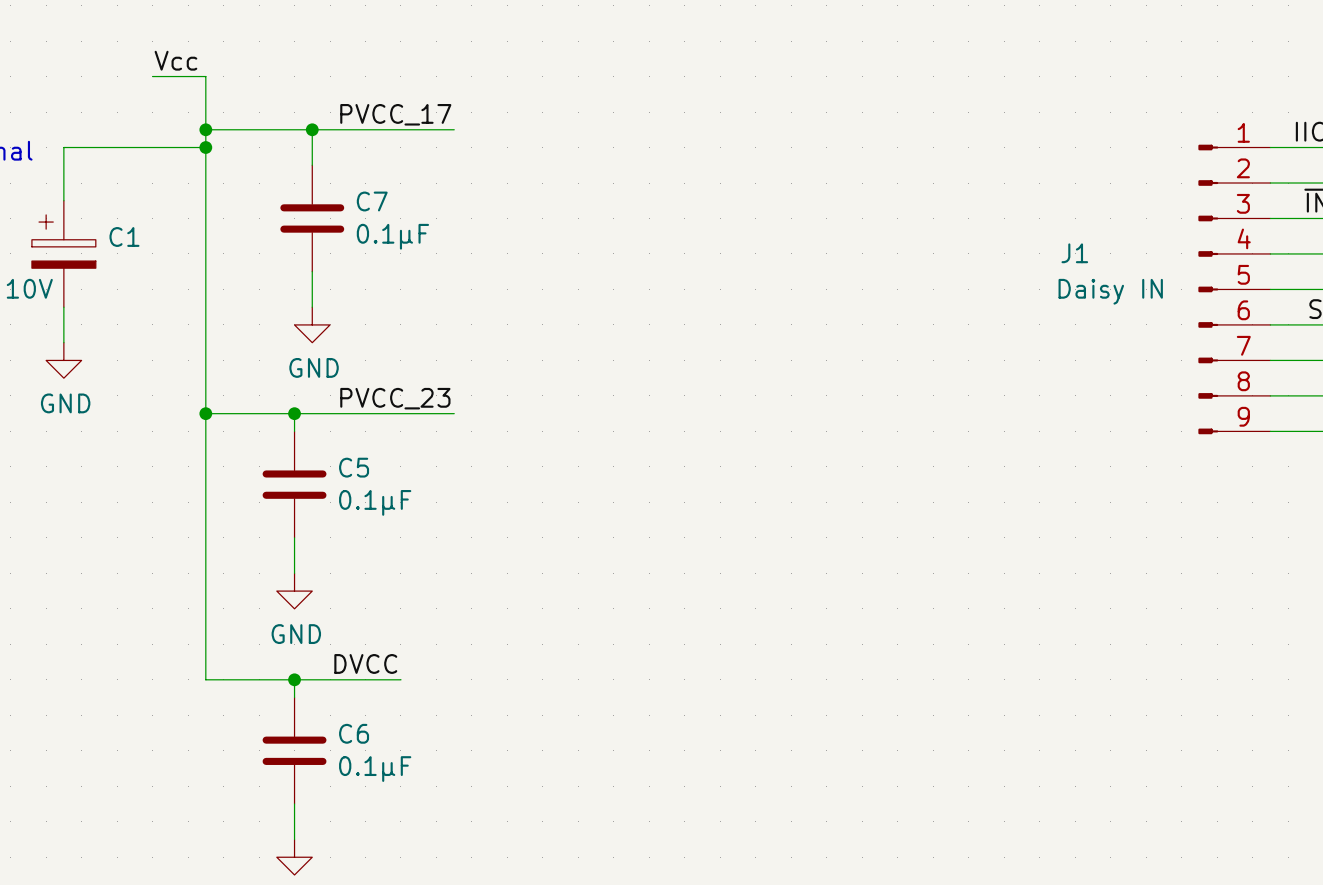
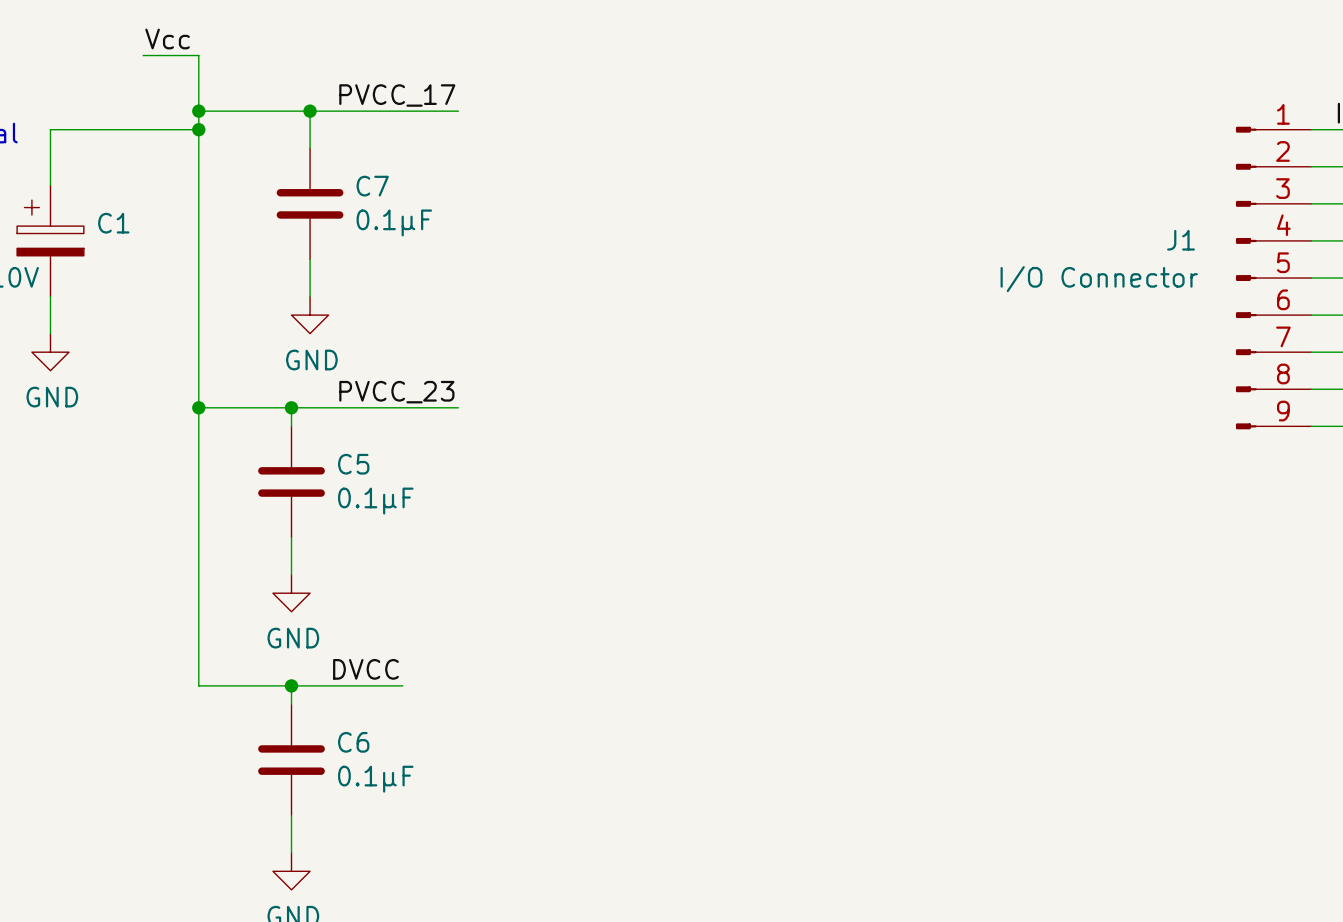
J1 name position: J1 (1074, 253) -> J1 (1181, 240)
J1 value: Daisy IN (1110, 291) -> I/O Connector (1099, 279)

